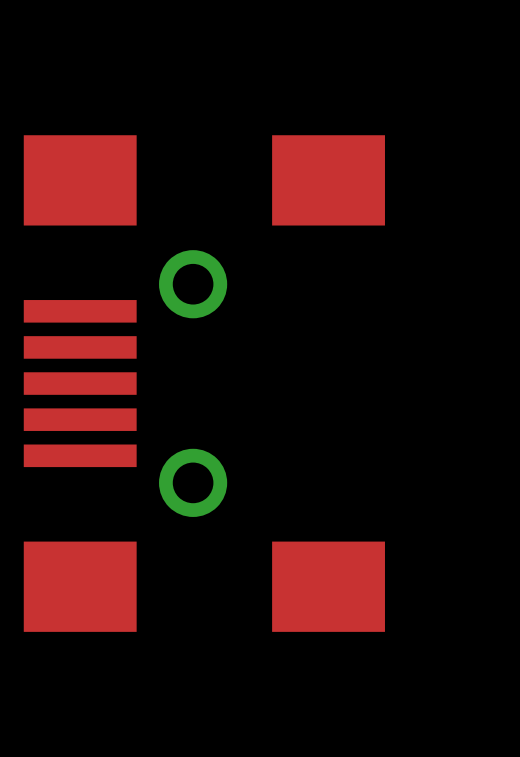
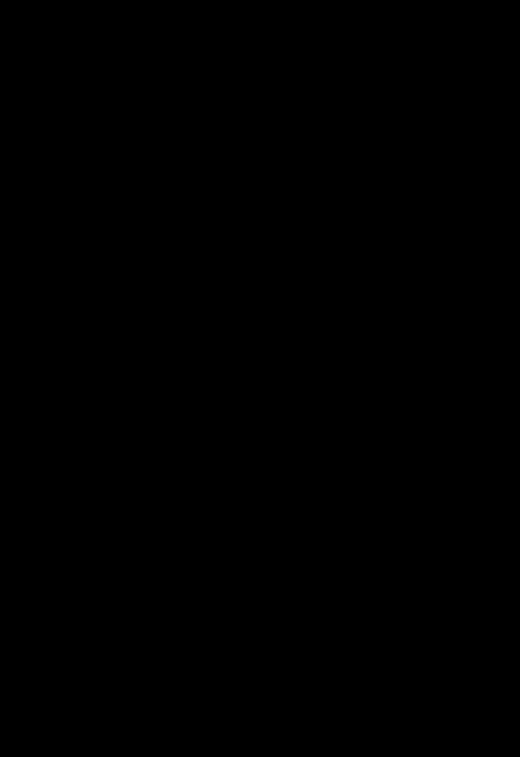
part: (204, 383) -> none

